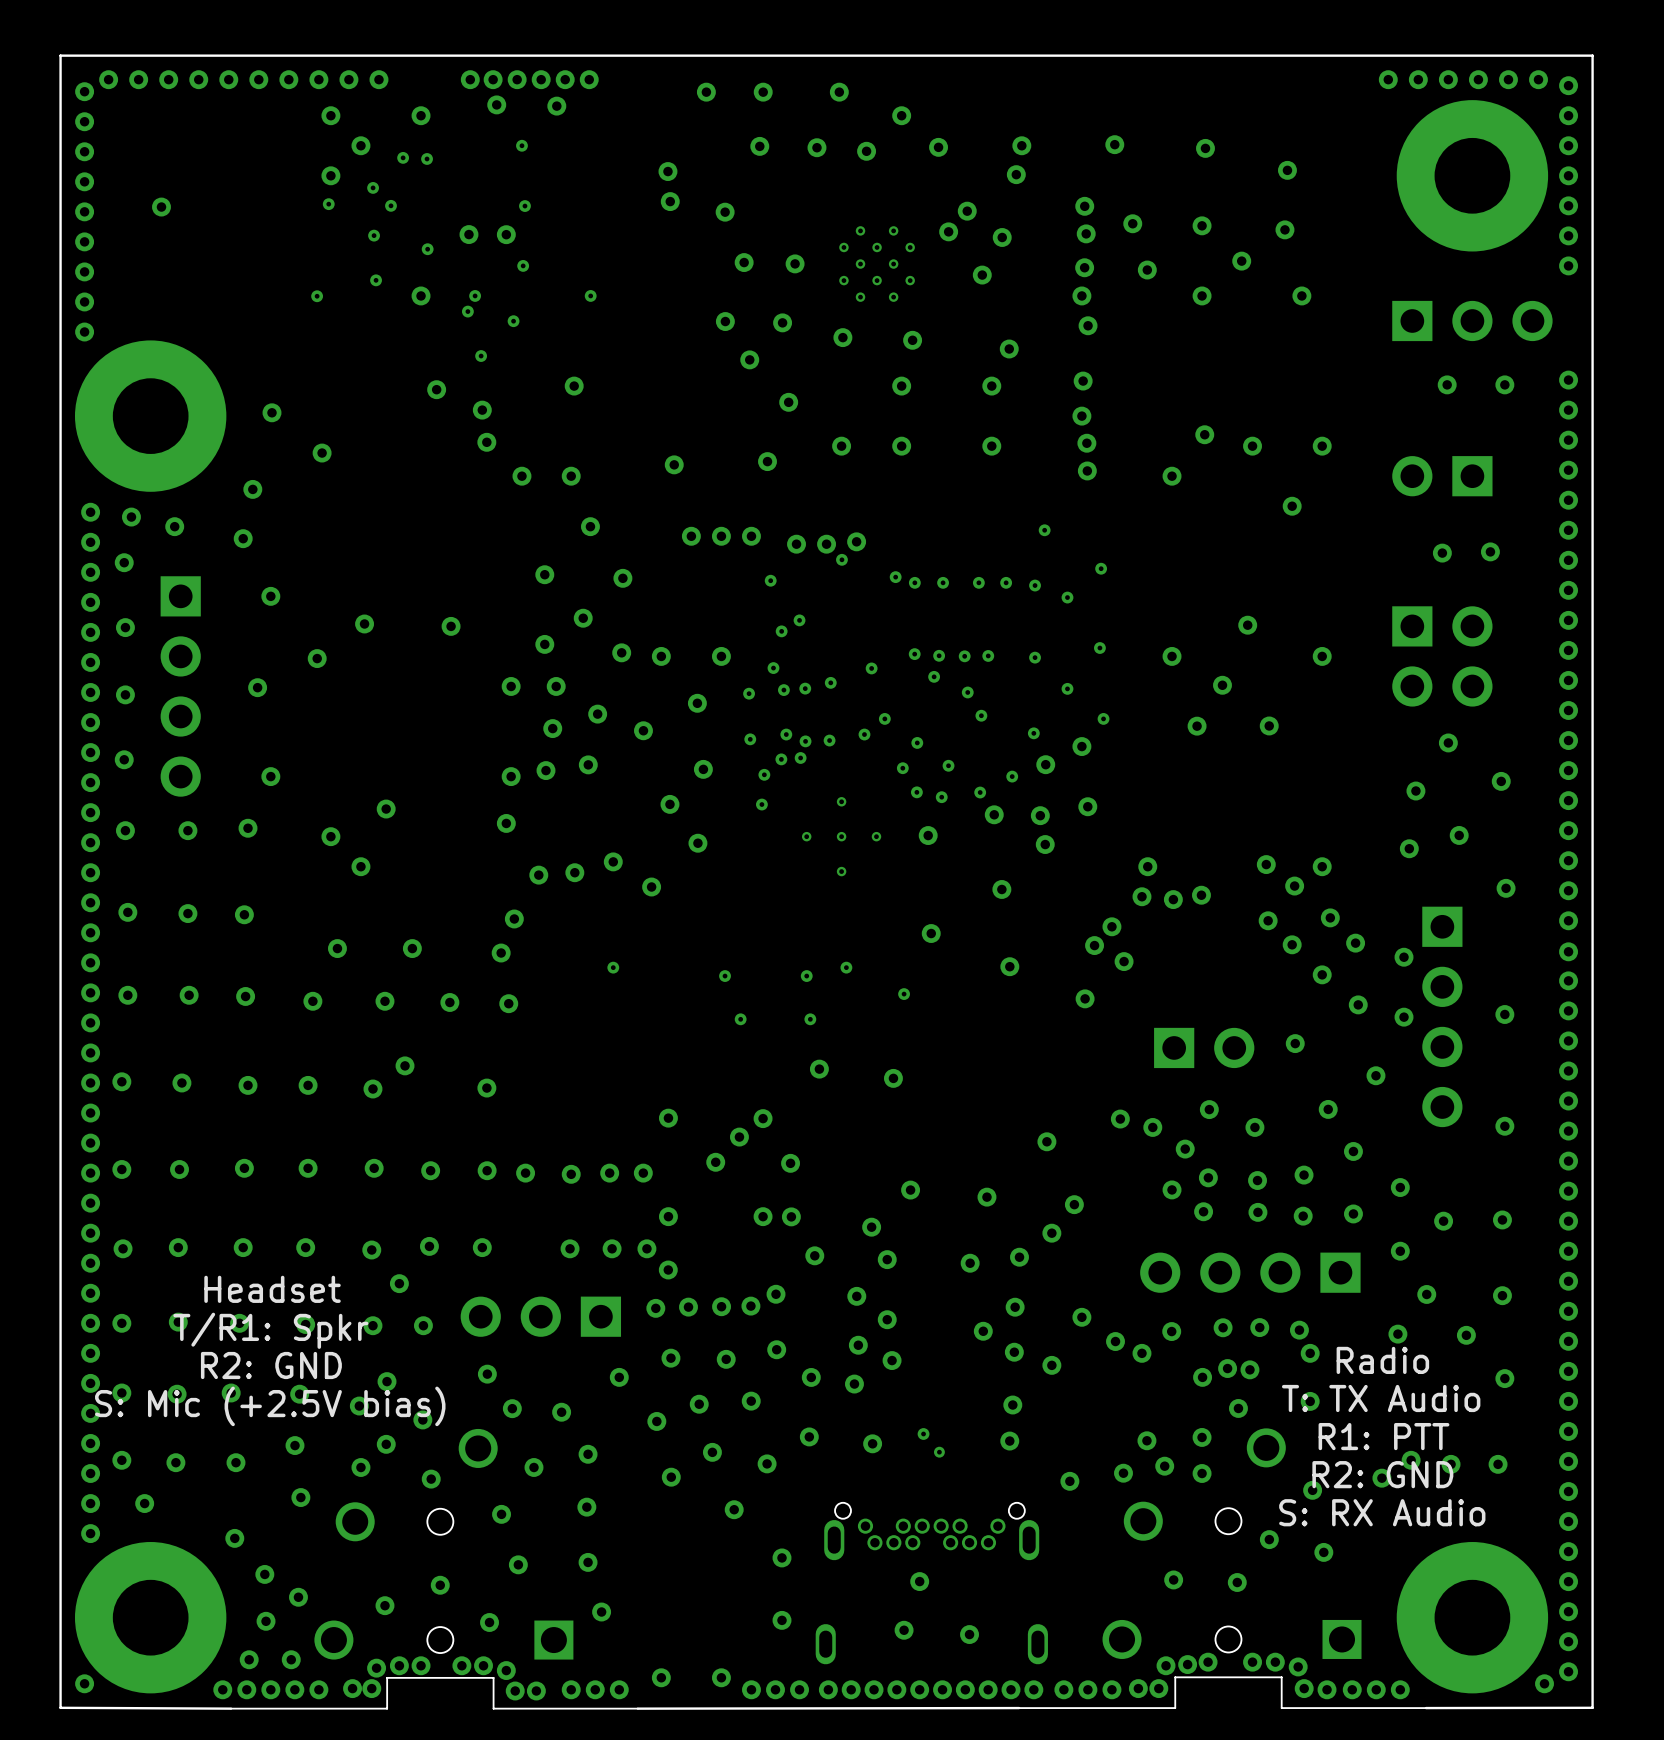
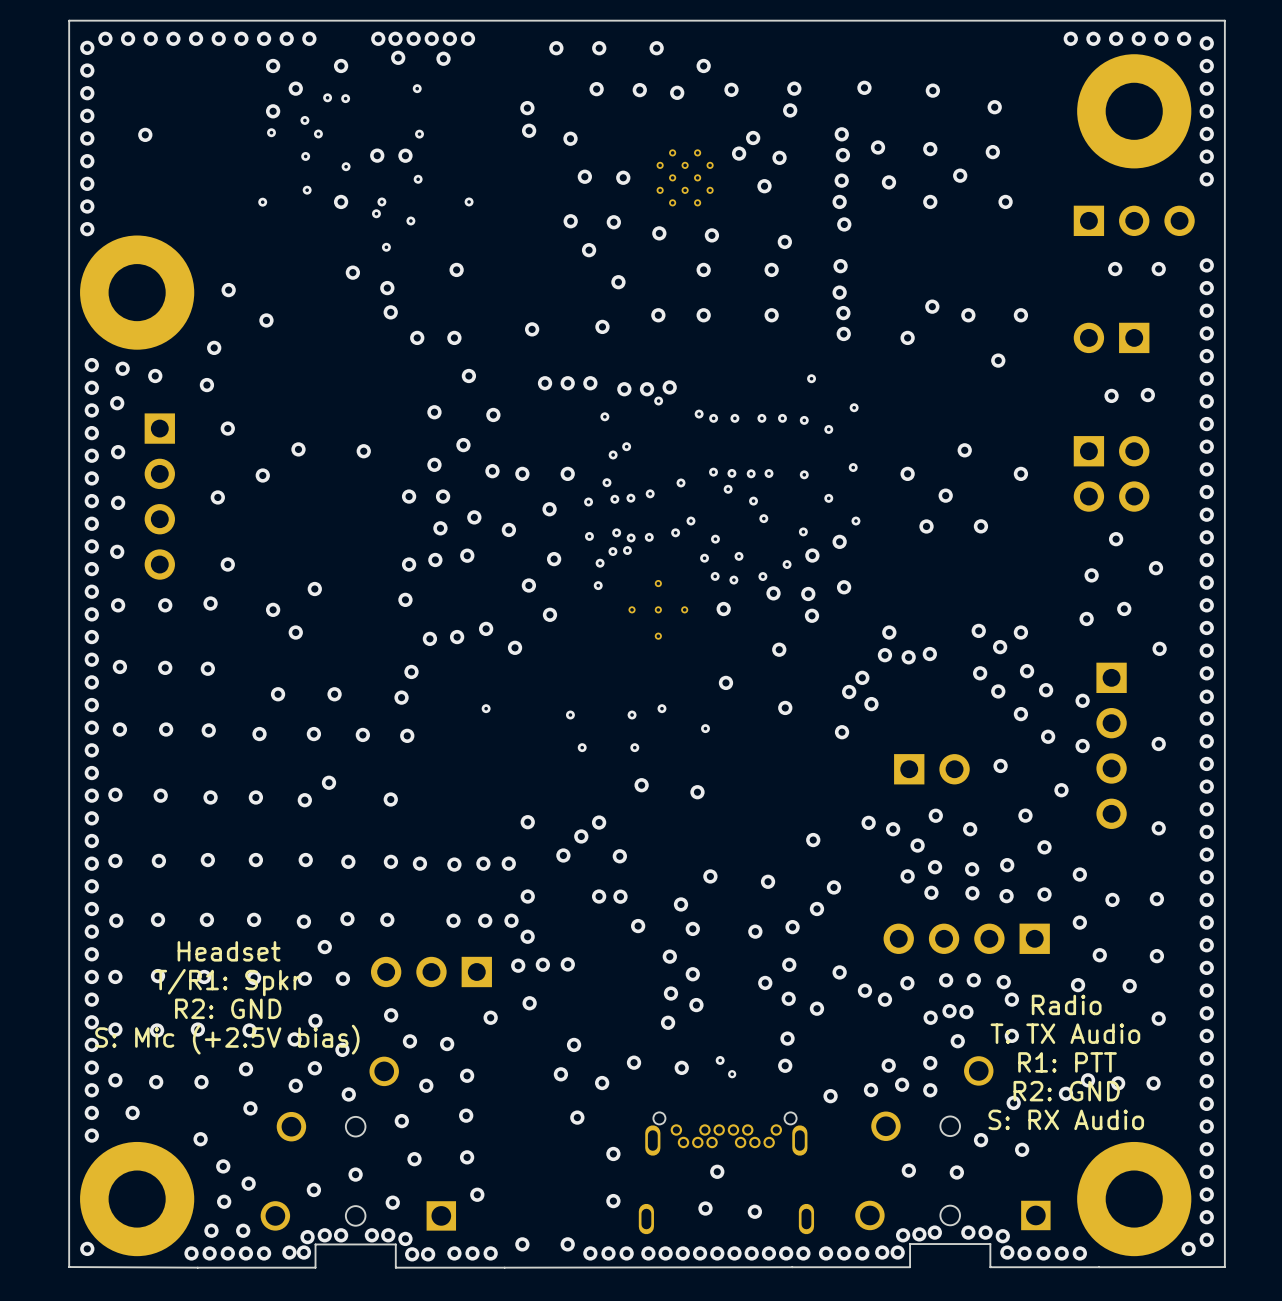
via: (776, 1294) -> none
via: (750, 1306) -> none
via: (776, 1349) -> none
via: (726, 1359) -> none
via: (811, 1377) -> none
via: (751, 1401) -> none
via: (699, 1404) -> none
via: none -> (574, 1044)
via: (656, 1421) -> none
via: (671, 1477) -> none

